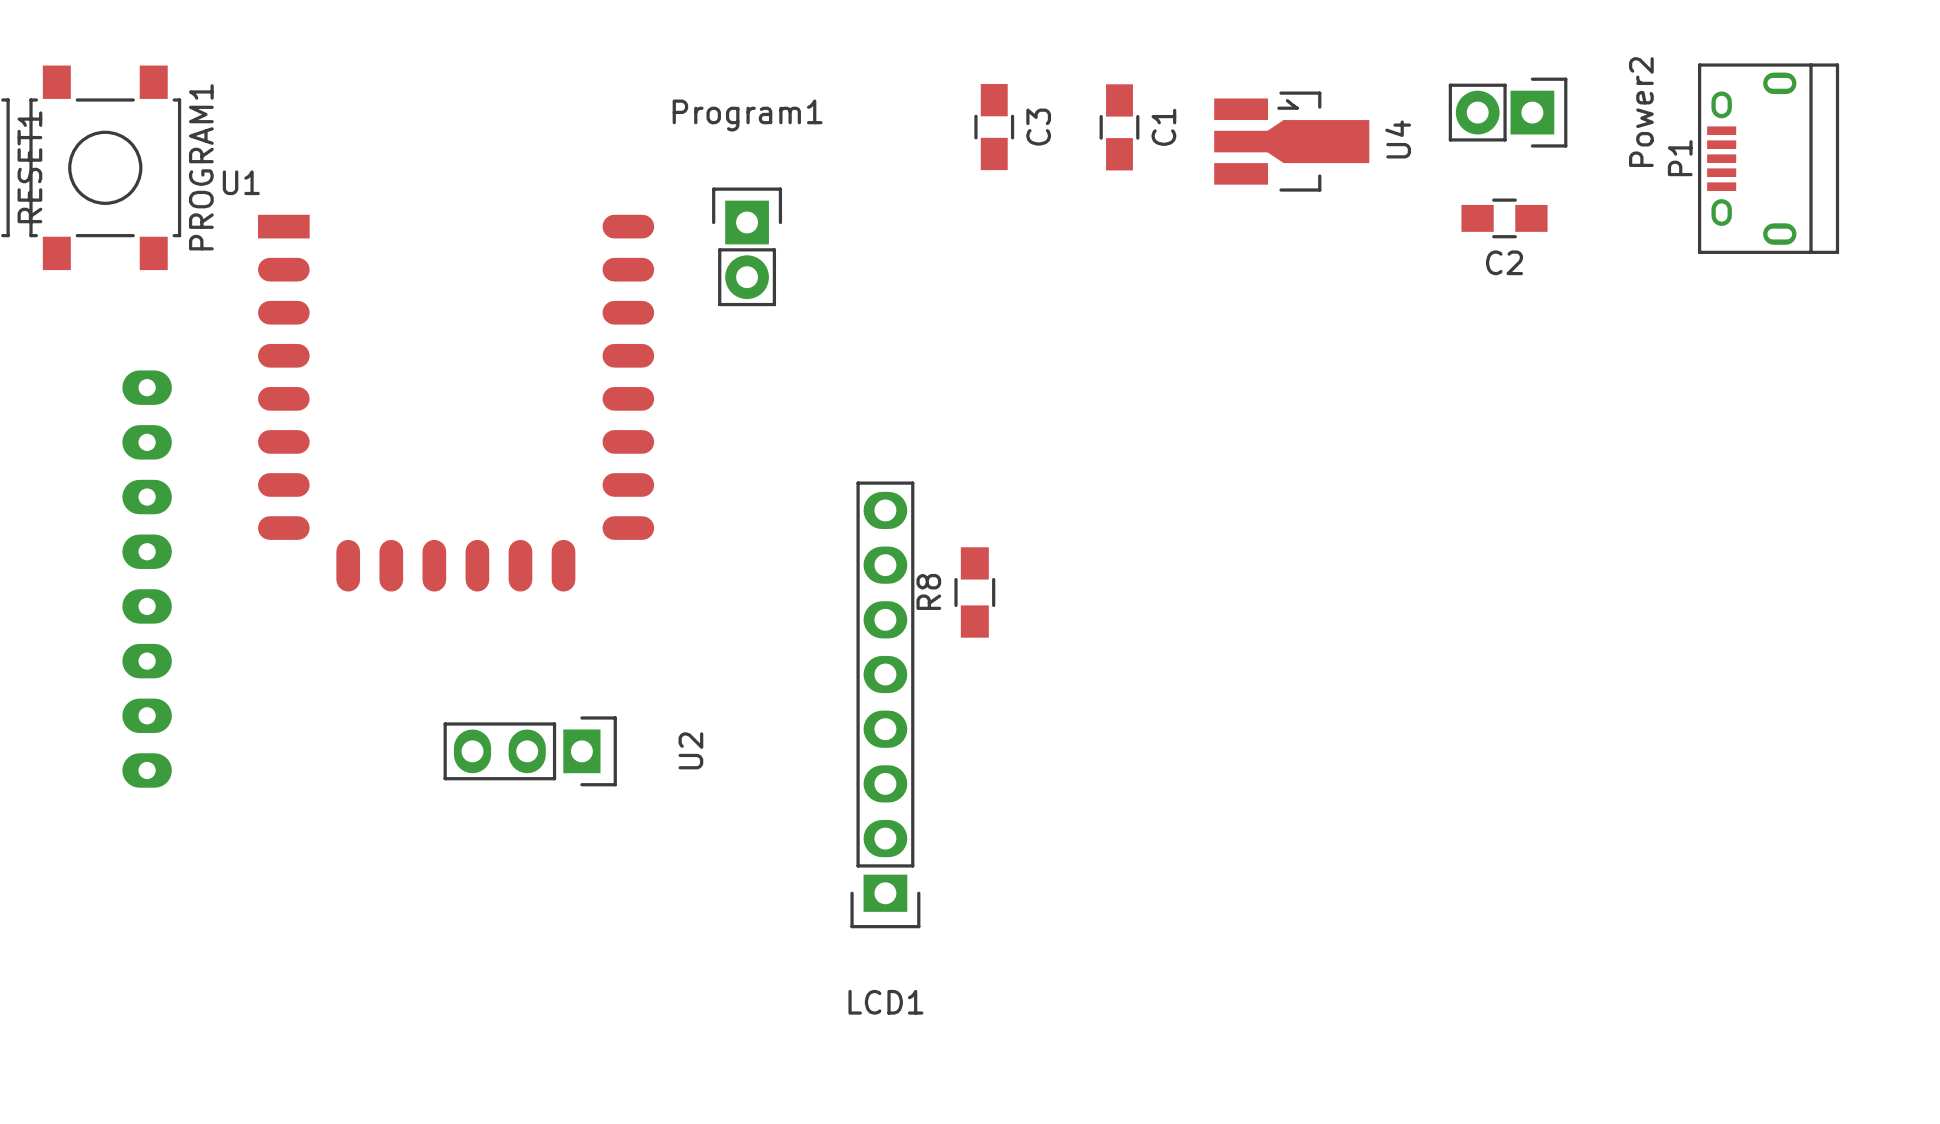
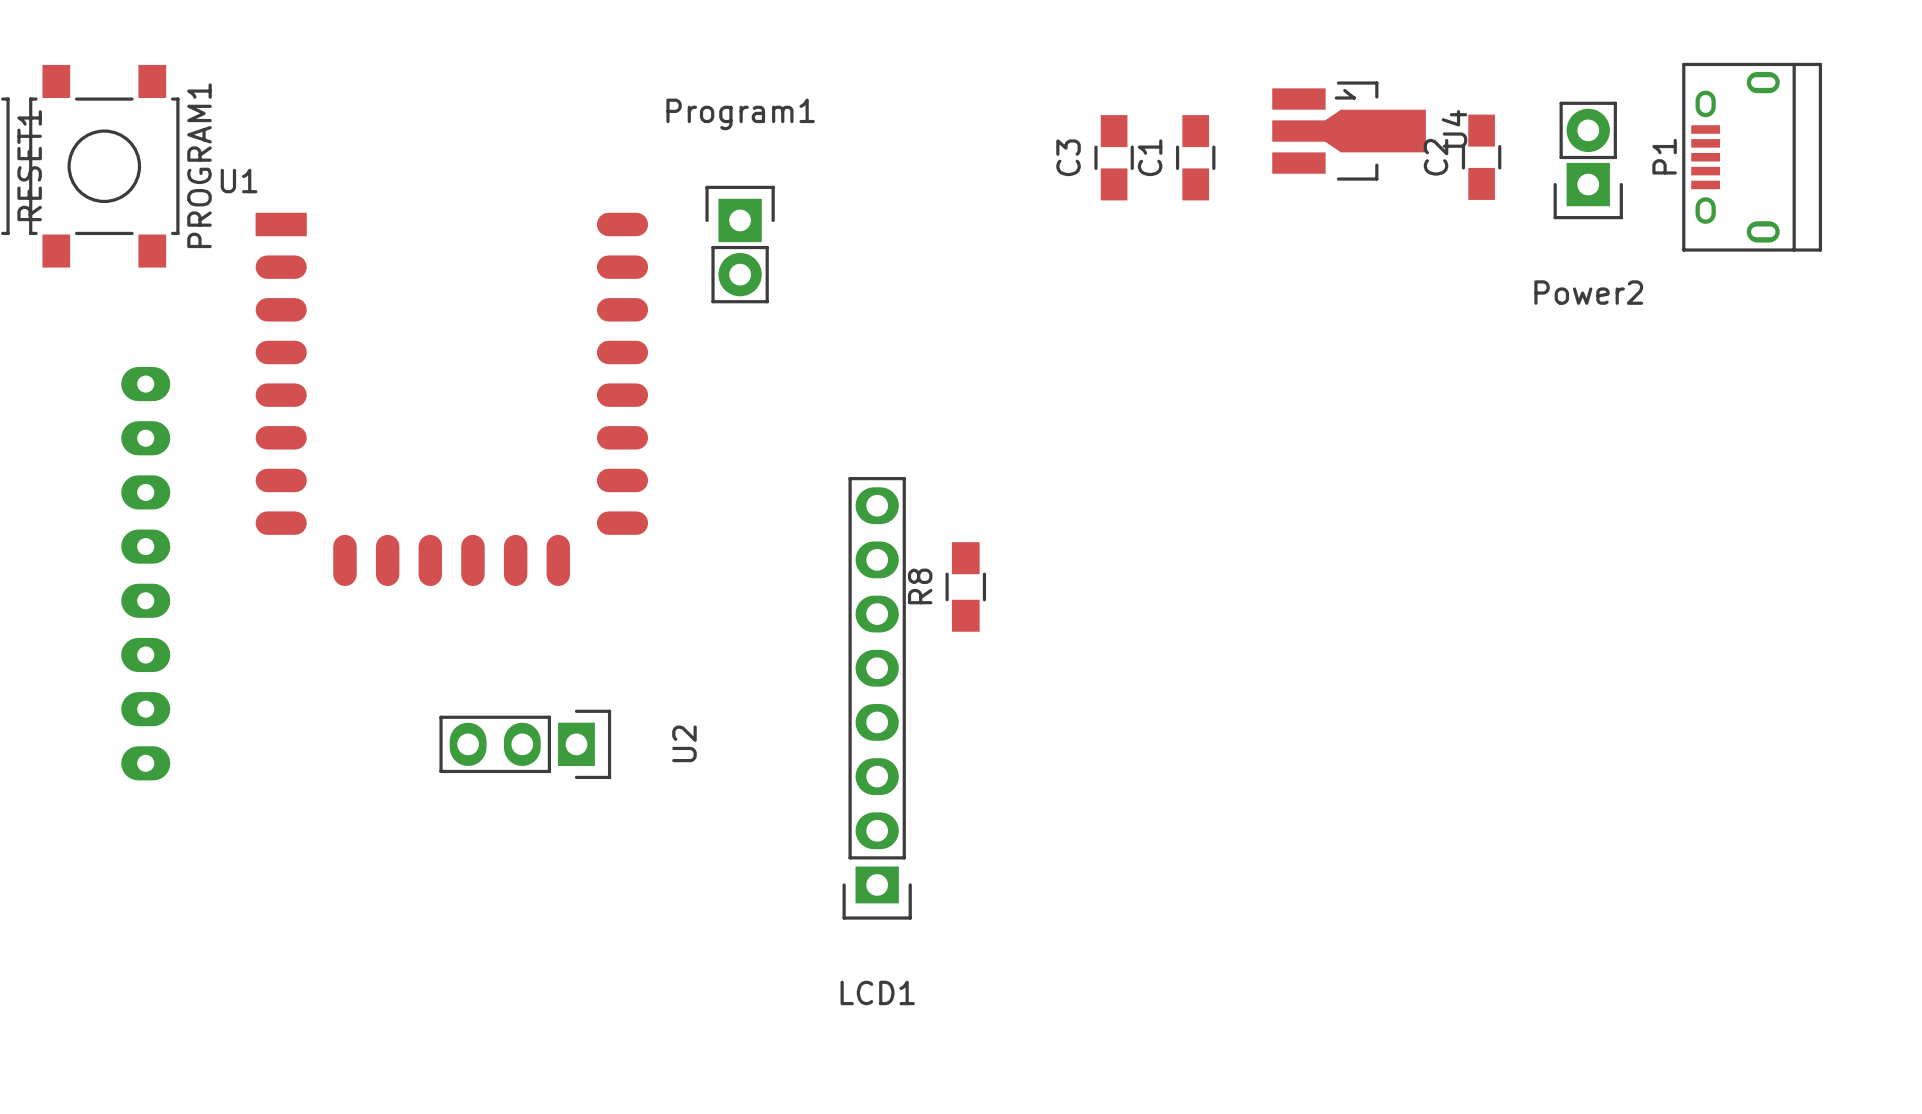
Power2 rotation: 0° (1508, 112) -> 90° clockwise (1588, 160)
Power2 position: (1508, 112) -> (1588, 160)
C3 position: (994, 127) -> (1114, 157)
C3 name position: C3 (1038, 127) -> C3 (1068, 157)
C1 position: (1119, 127) -> (1195, 157)
C1 name position: C1 (1163, 127) -> C1 (1150, 157)
U4 position: (1291, 141) -> (1349, 131)
C2 rotation: 0° (1504, 218) -> 90° clockwise (1481, 157)
C2 position: (1504, 218) -> (1481, 157)

